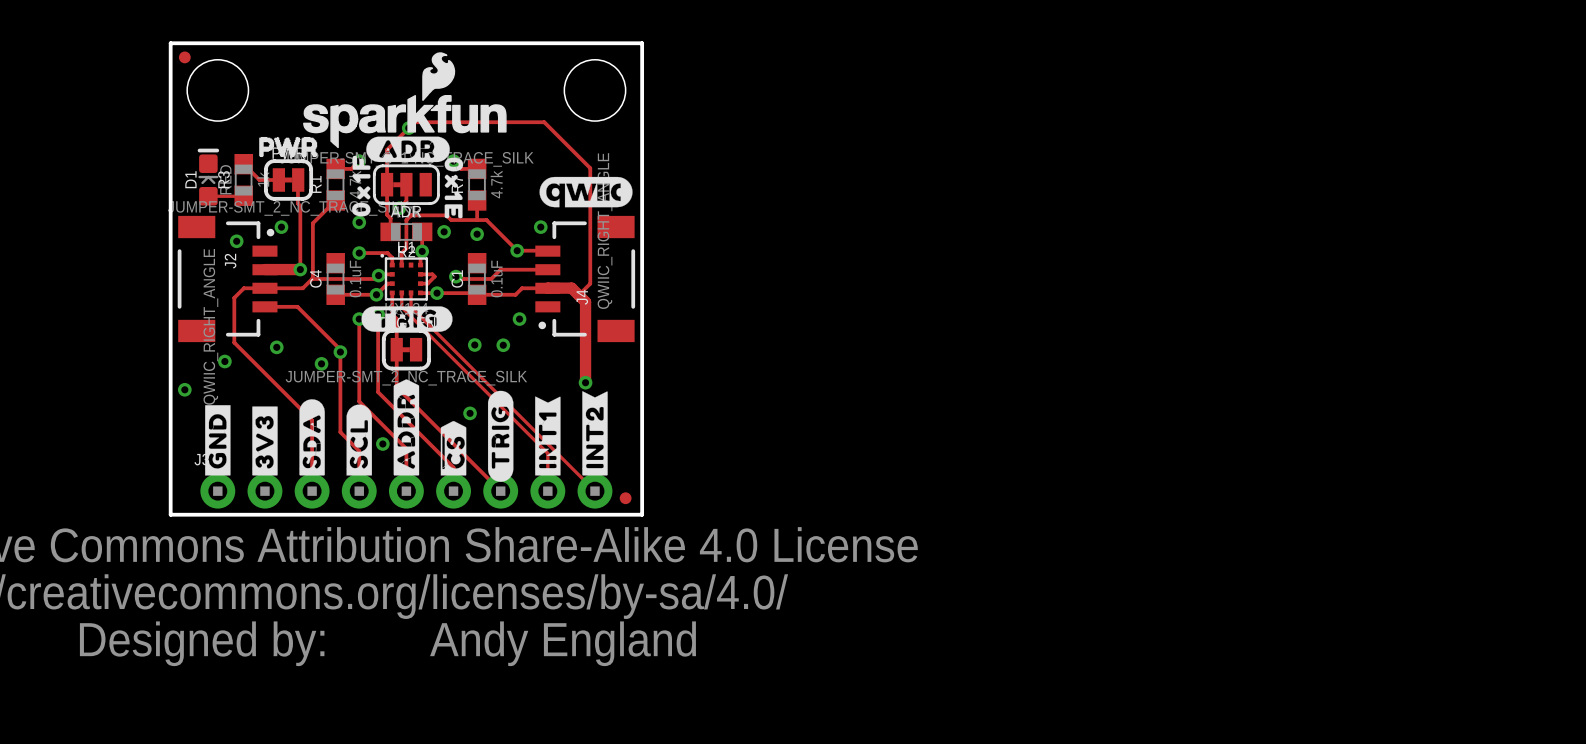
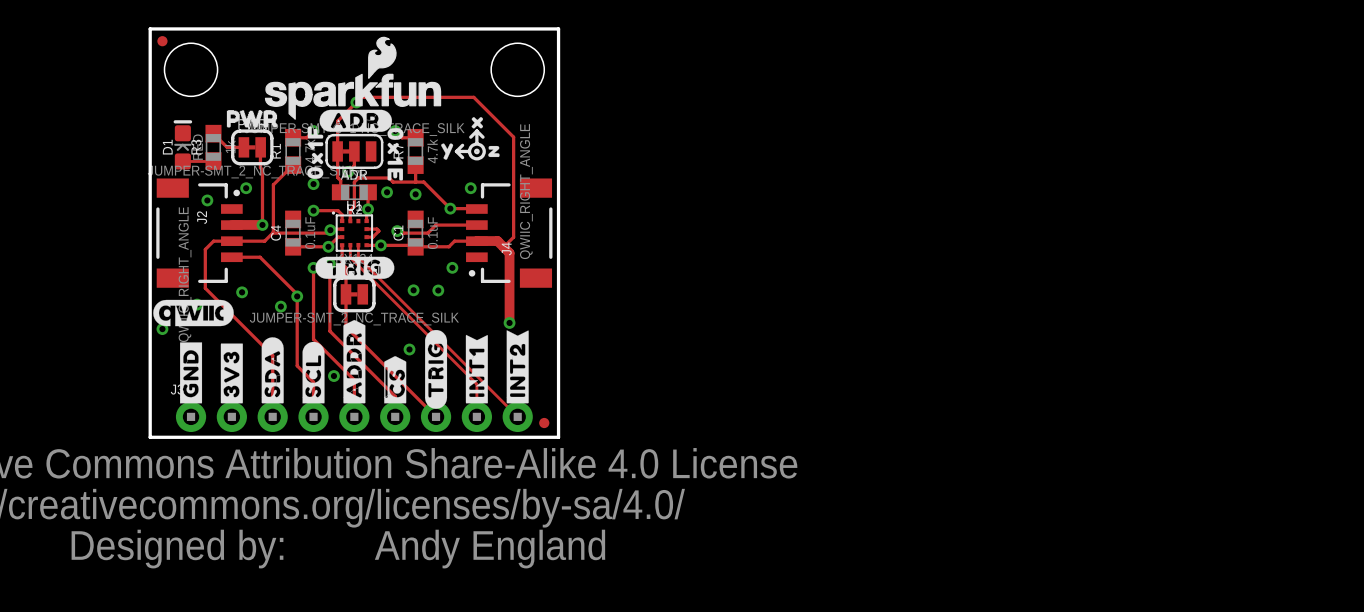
drawing: none -> [441, 117, 500, 161]
line: none -> (476, 131) (470, 137)
line: none -> (476, 131) (476, 143)
line: none -> (476, 131) (483, 137)
line: none -> (462, 145) (456, 151)
line: none -> (456, 151) (462, 157)
line: none -> (456, 151) (468, 151)
drawing position: (586, 192) -> (193, 313)

